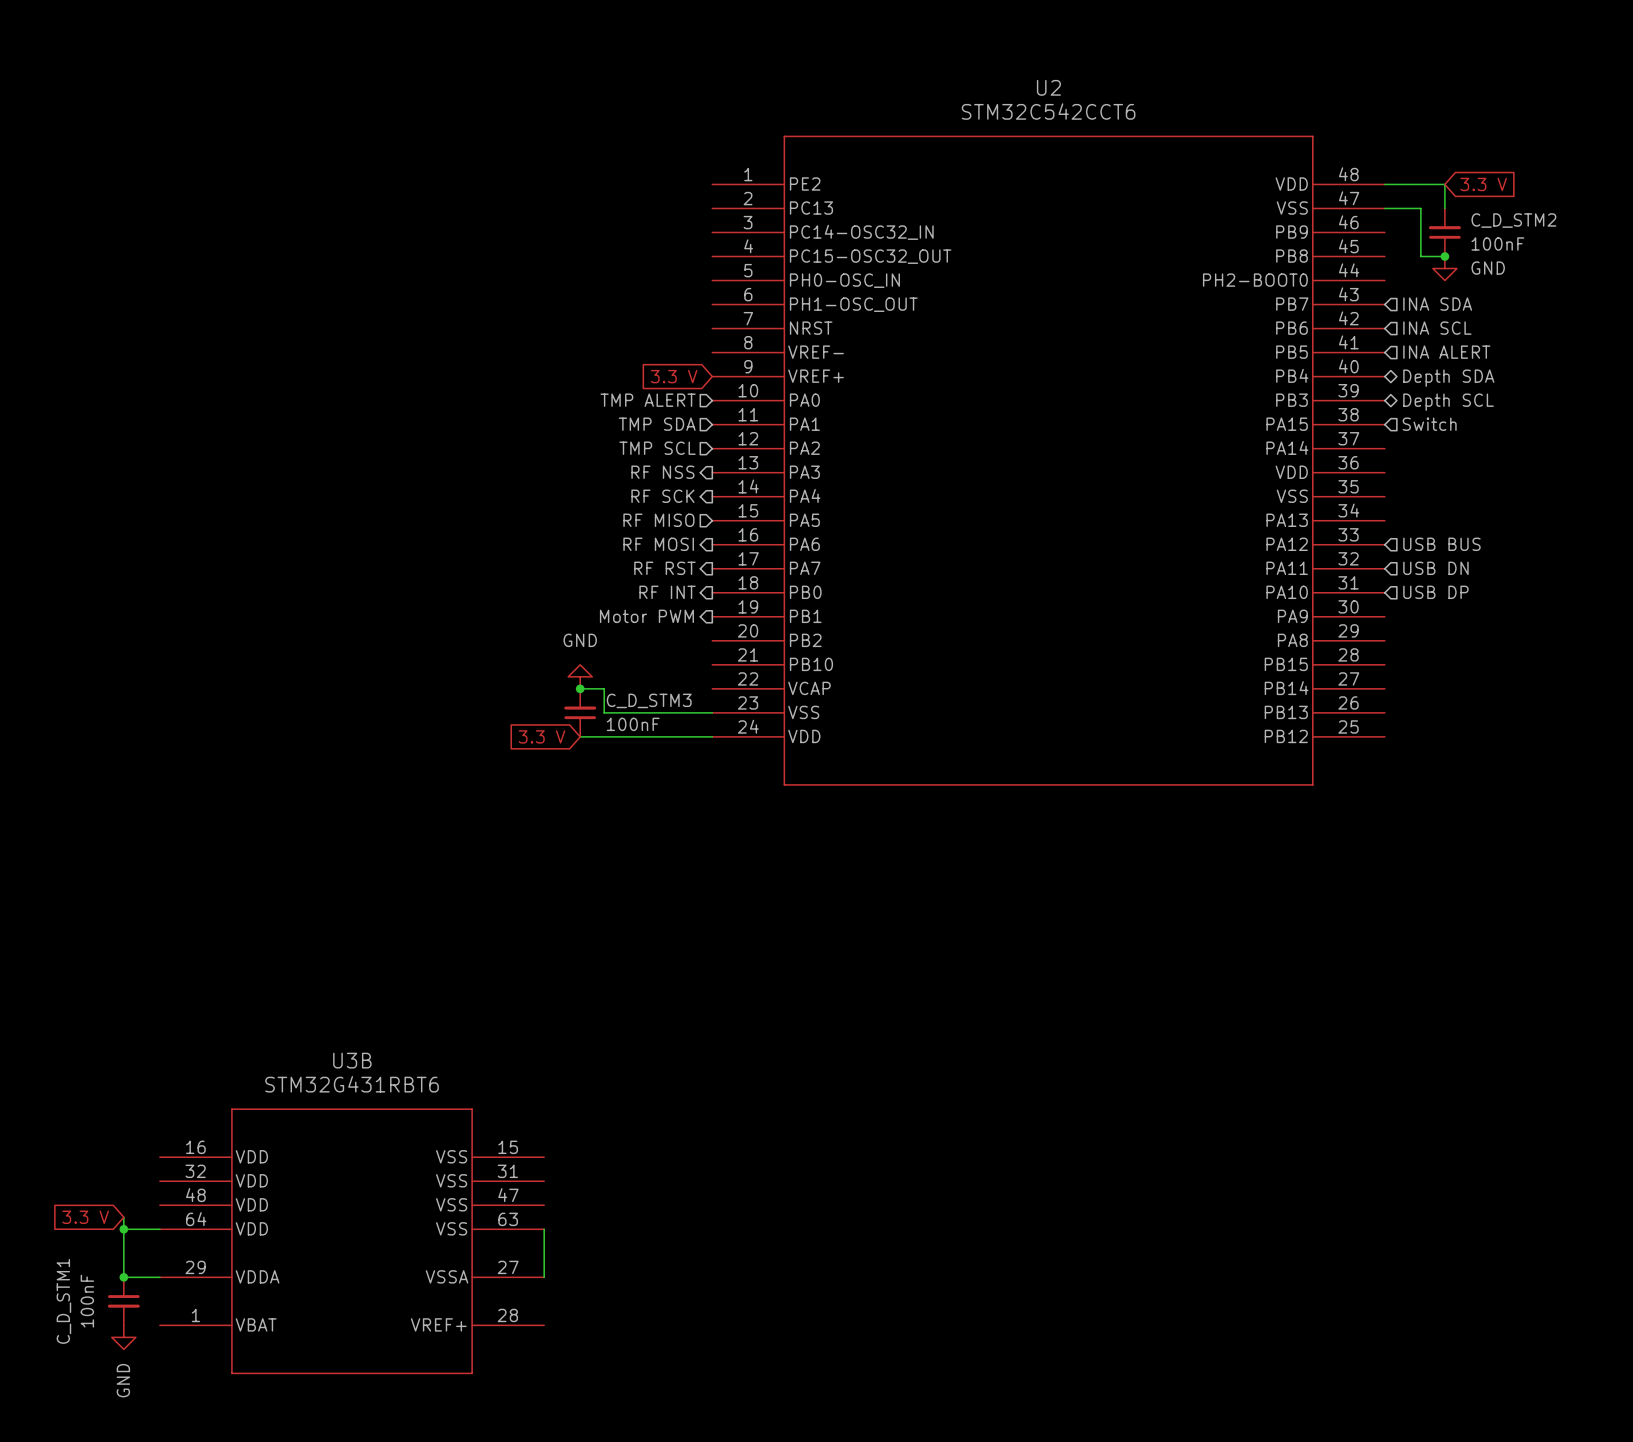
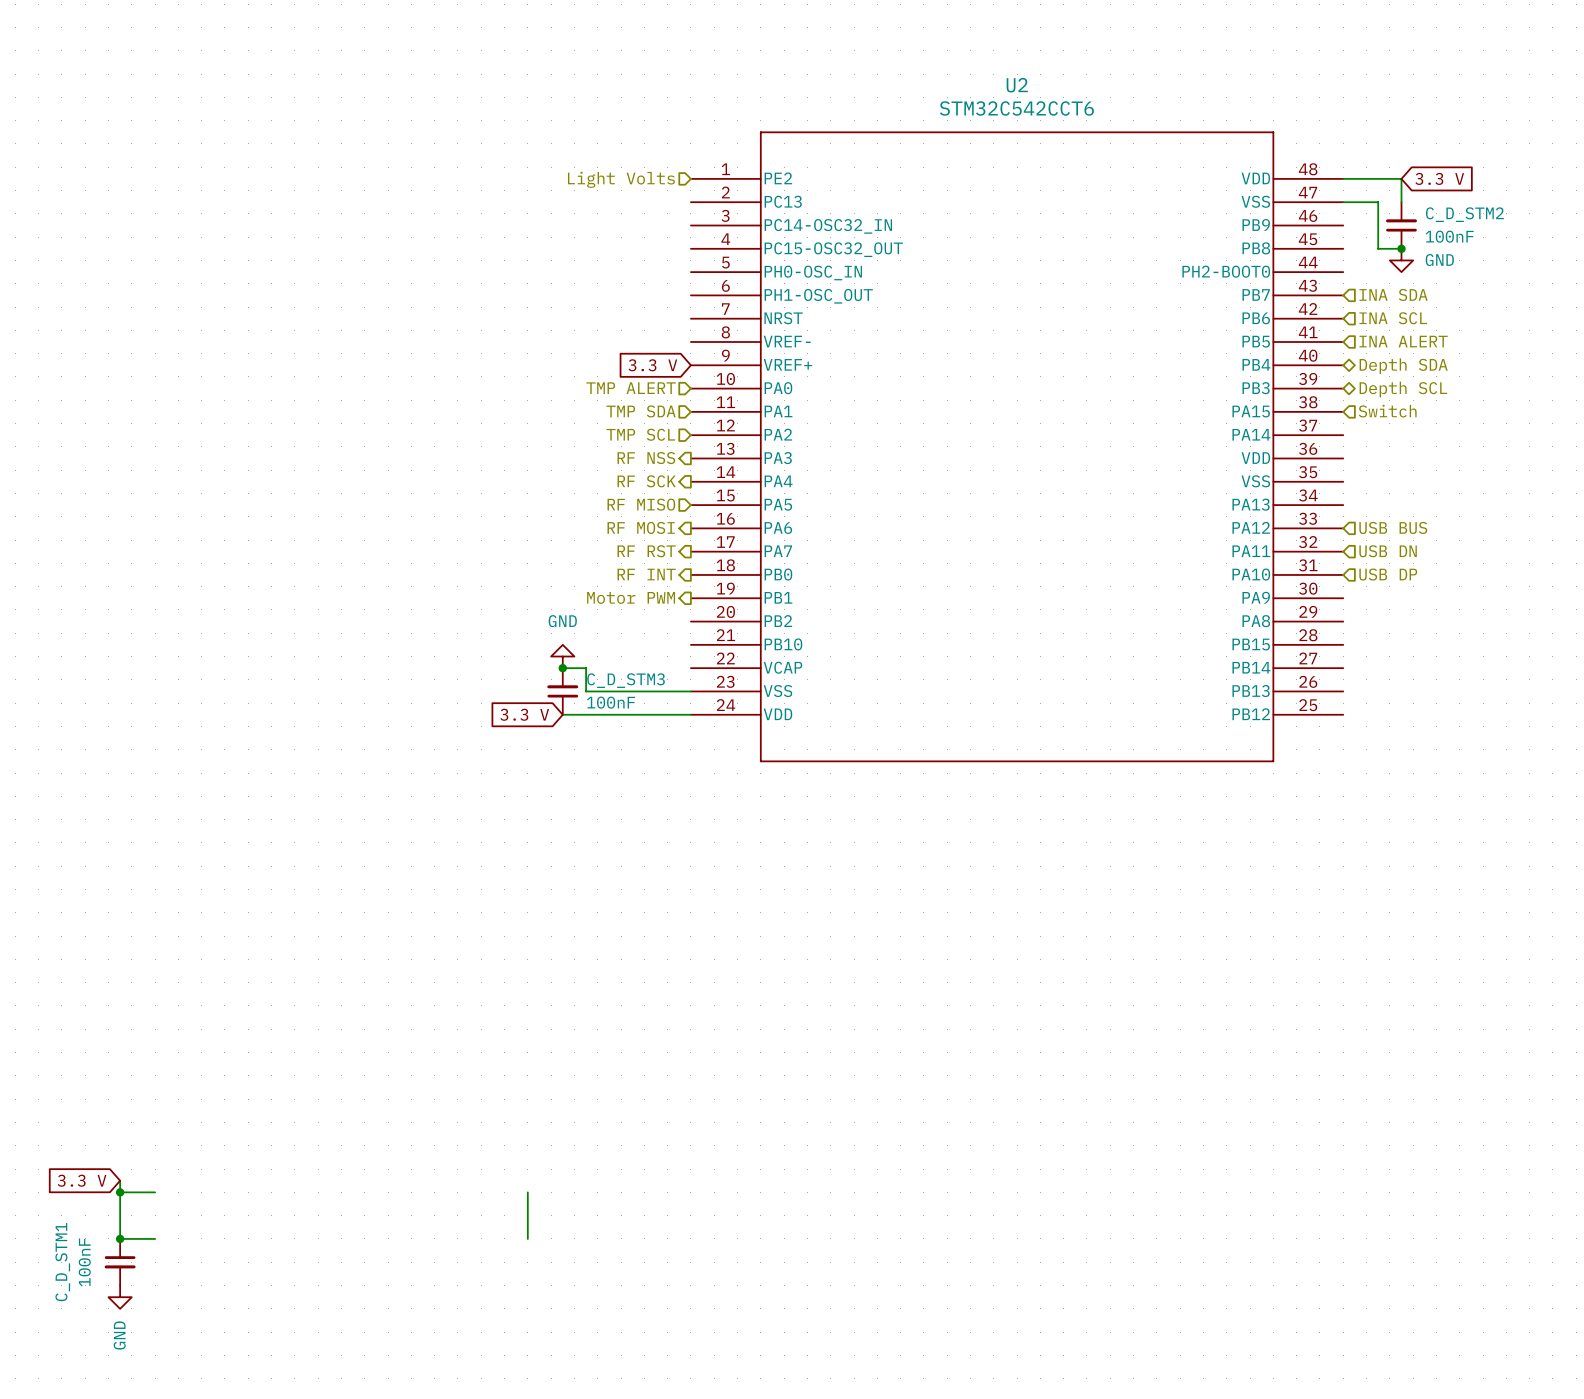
hierarchical label: none -> Light Volts (621, 179)
U3B: STM32G431RBT6 (352, 1241) -> none

